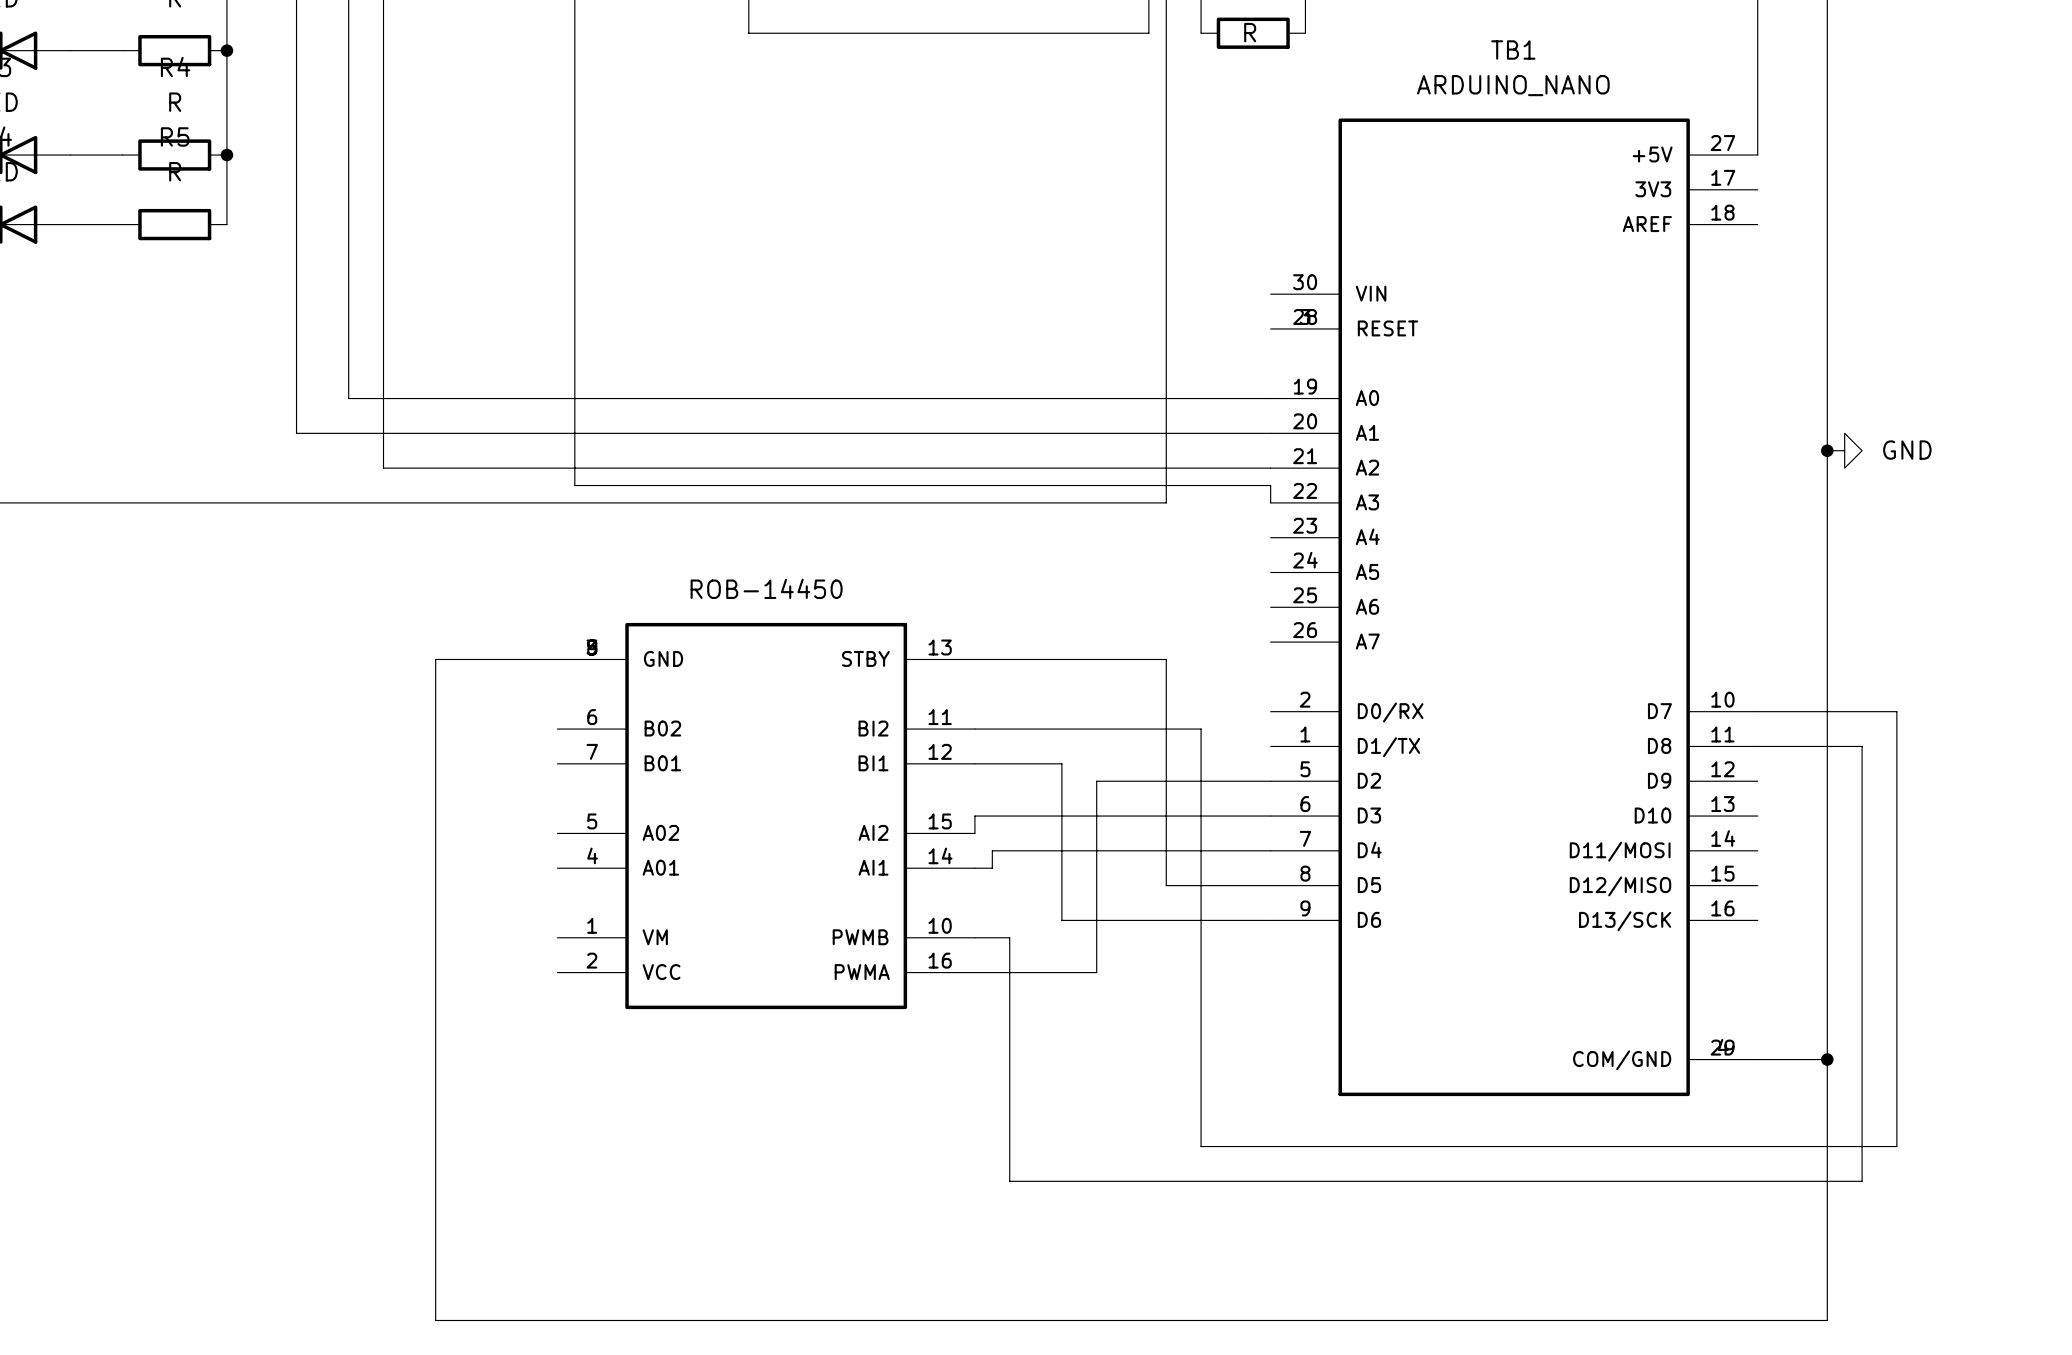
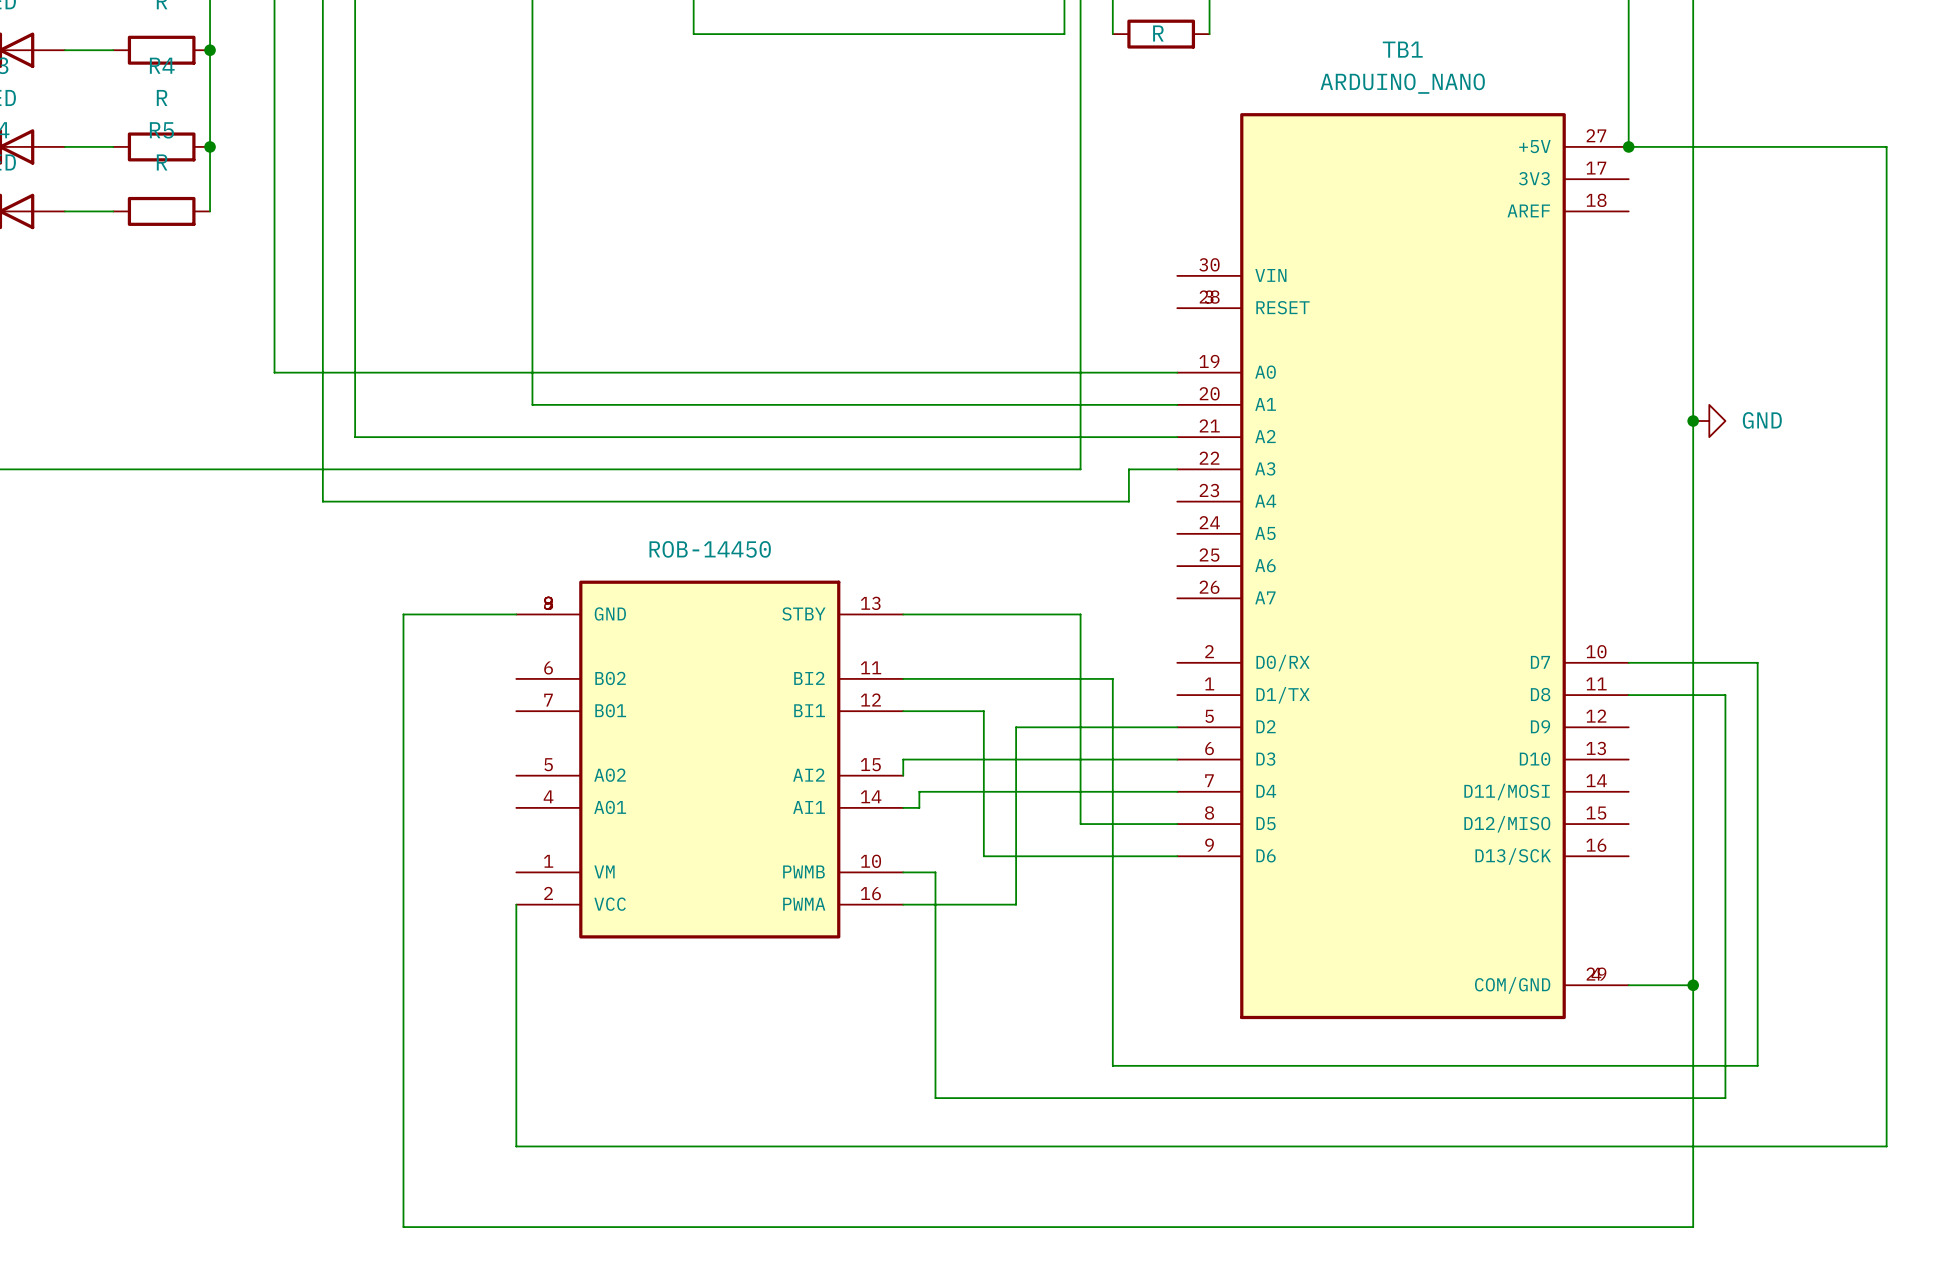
wire: none -> (1628, 146) (1886, 146) (1886, 1146) (516, 1146) (516, 904)
junction: none -> (1628, 146)
wire: (296, 398) (296, 433) (574, 433) (574, 485) (1270, 485) (1270, 502) -> (274, 372) (322, 372) (322, 501) (1128, 501) (1128, 469) (1177, 469)

